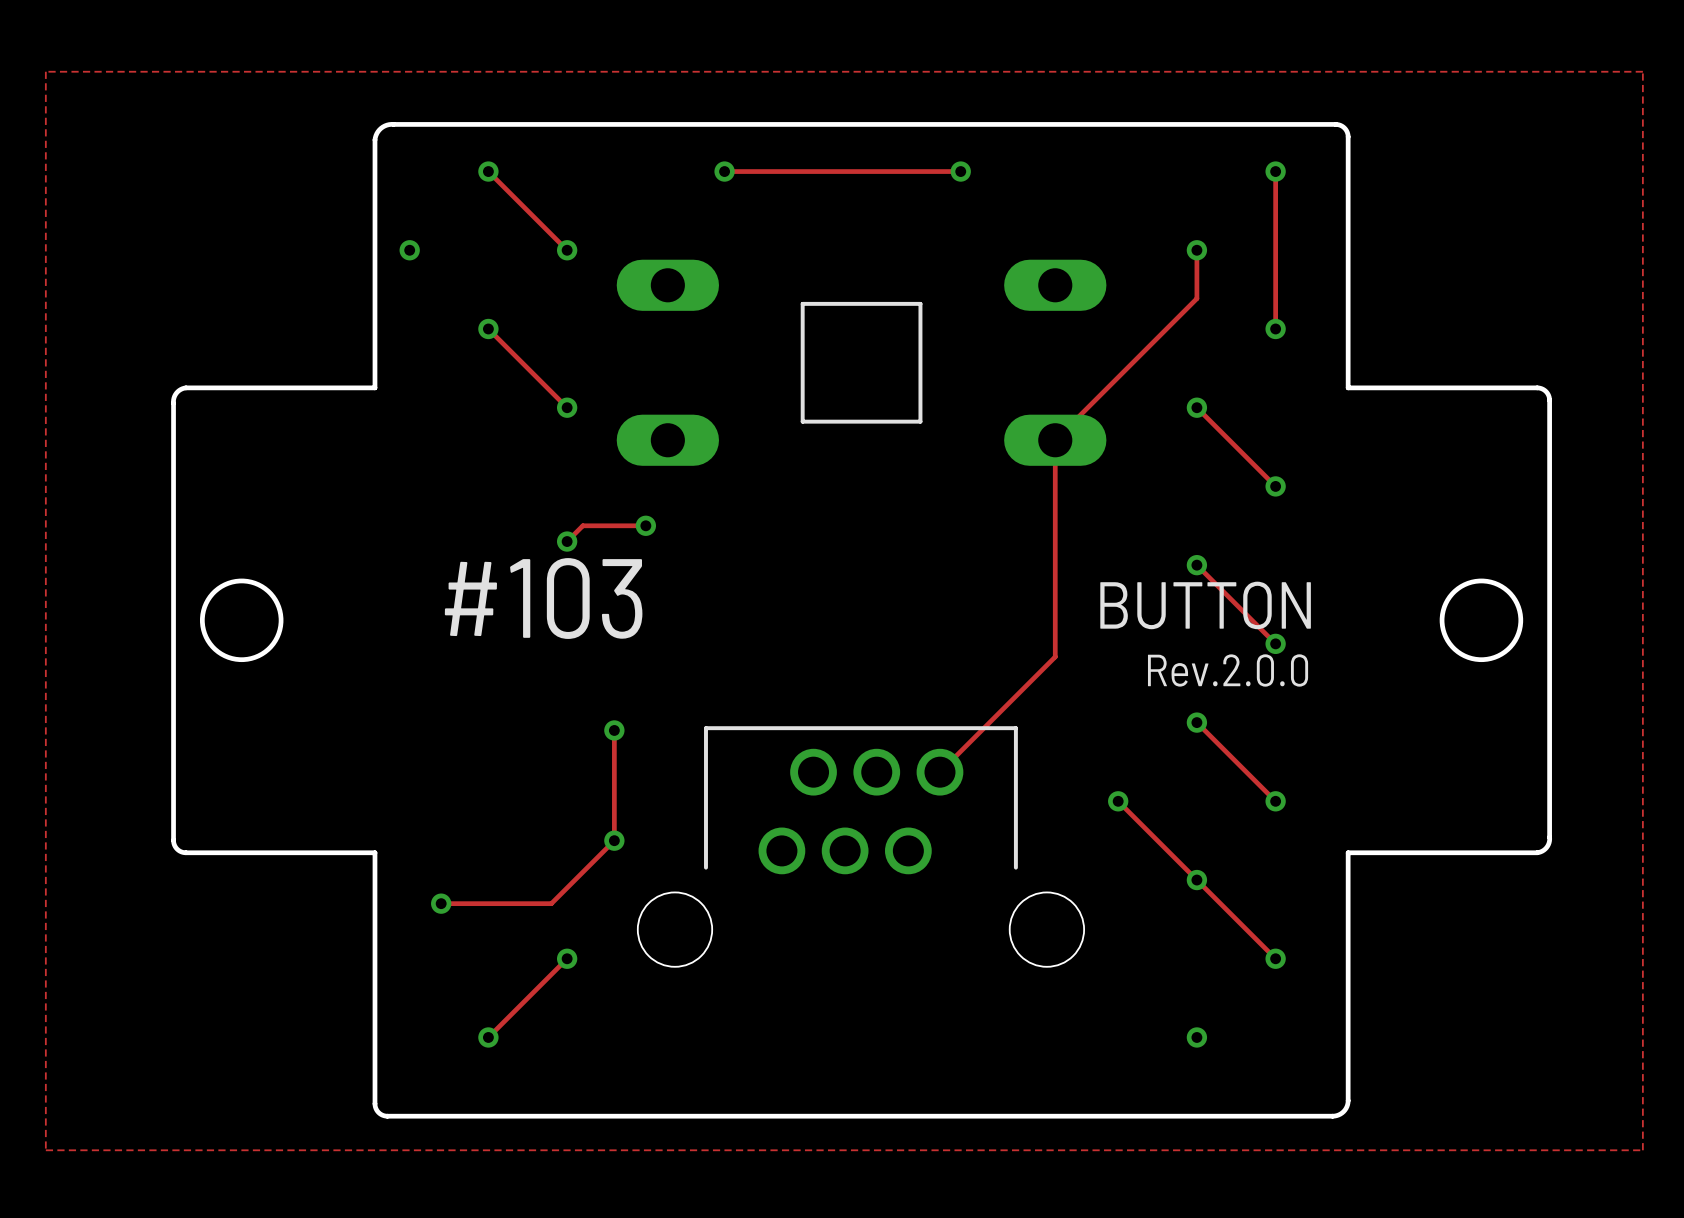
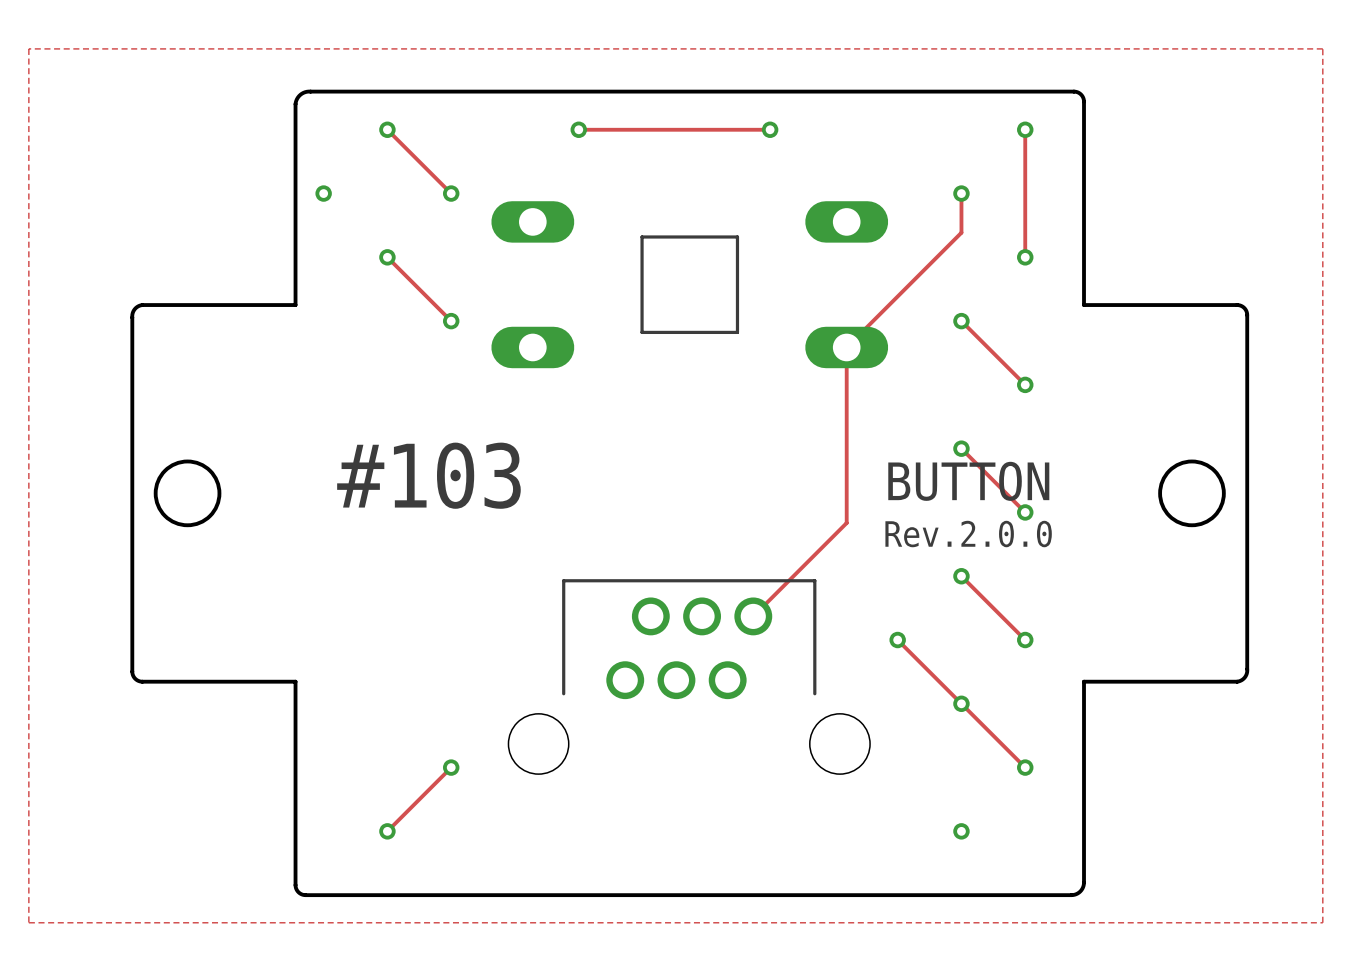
track: (645, 525) (582, 525) (567, 541) -> none
via: (645, 525) -> none
via: (567, 541) -> none
track: (614, 730) (614, 840) (551, 903) (441, 903) -> none
via: (614, 730) -> none
via: (614, 840) -> none
via: (441, 903) -> none

